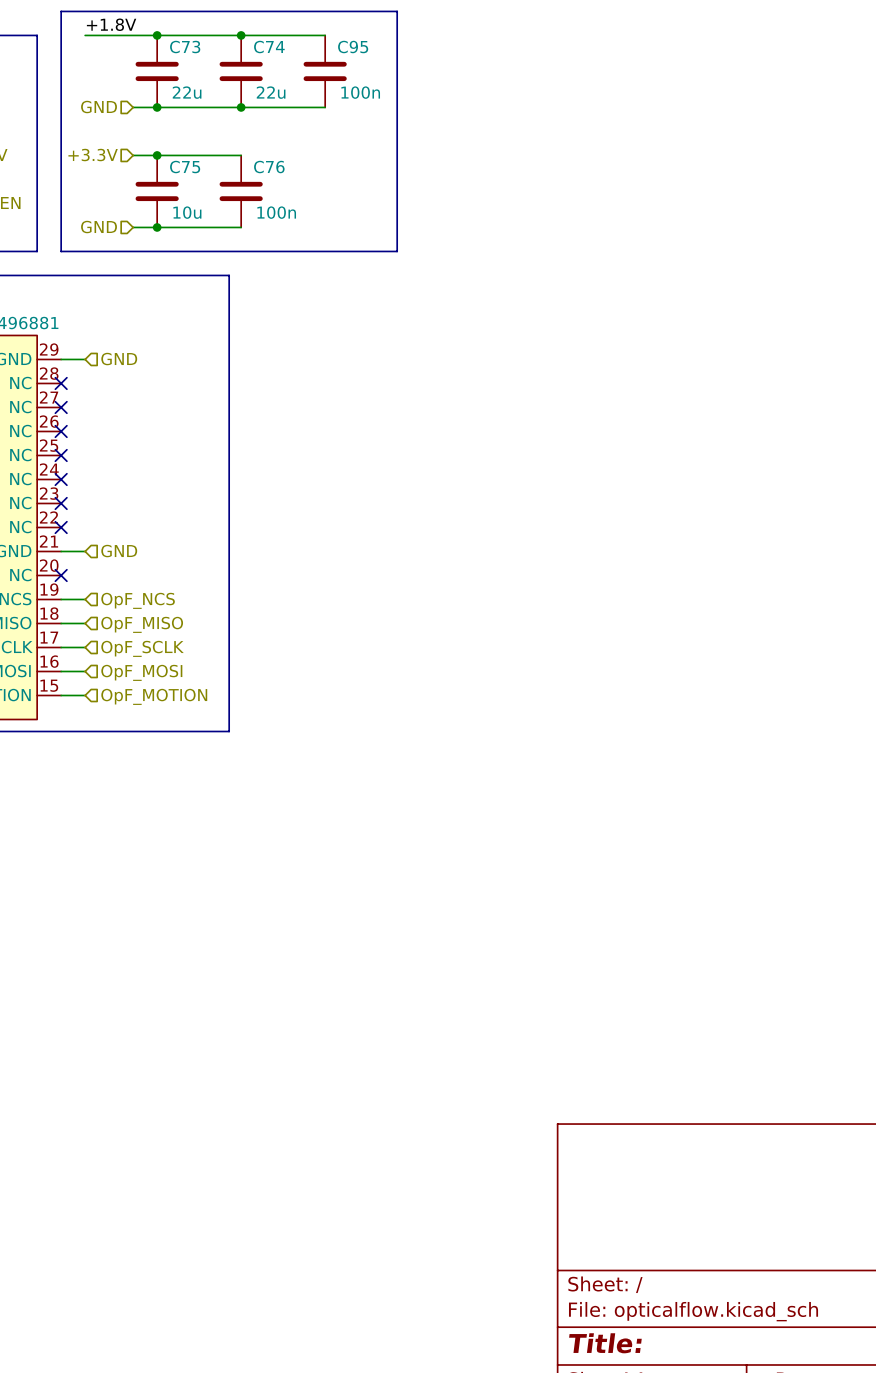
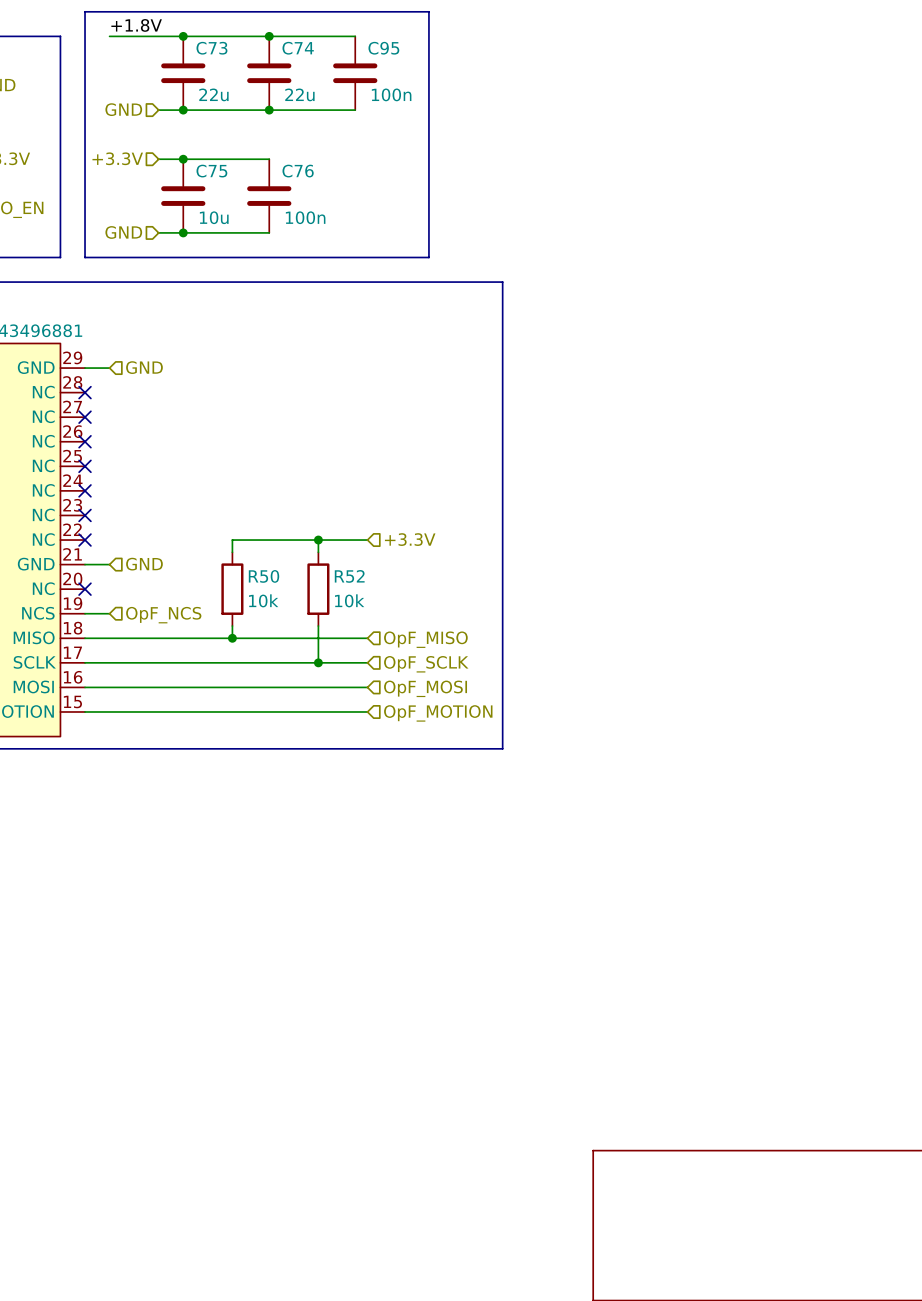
line: (229, 275) (229, 731) -> (256, 282) (502, 282) (502, 748) (256, 748)
wire: none -> (318, 540) (318, 552)
junction: none -> (318, 540)
wire: none -> (367, 540) (232, 540) (232, 552)
hierarchical label: none -> +3.3V (410, 539)
R50: none -> 10k (232, 589)
R52: none -> 10k (318, 589)
wire: none -> (232, 626) (232, 638)
wire: none -> (318, 626) (318, 662)
wire: none -> (109, 638) (367, 638)
junction: none -> (232, 638)
hierarchical label: OpF_MISO (142, 624) -> none
hierarchical label: none -> OpF_MISO (425, 639)
wire: none -> (109, 662) (367, 662)
junction: none -> (318, 662)
hierarchical label: OpF_SCLK (142, 648) -> none
hierarchical label: none -> OpF_SCLK (426, 664)
wire: none -> (109, 687) (367, 687)
hierarchical label: OpF_MOSI (141, 672) -> none
hierarchical label: none -> OpF_MOSI (425, 688)
wire: none -> (109, 711) (367, 711)
hierarchical label: OpF_MOTION (154, 696) -> none
hierarchical label: none -> OpF_MOTION (438, 713)

